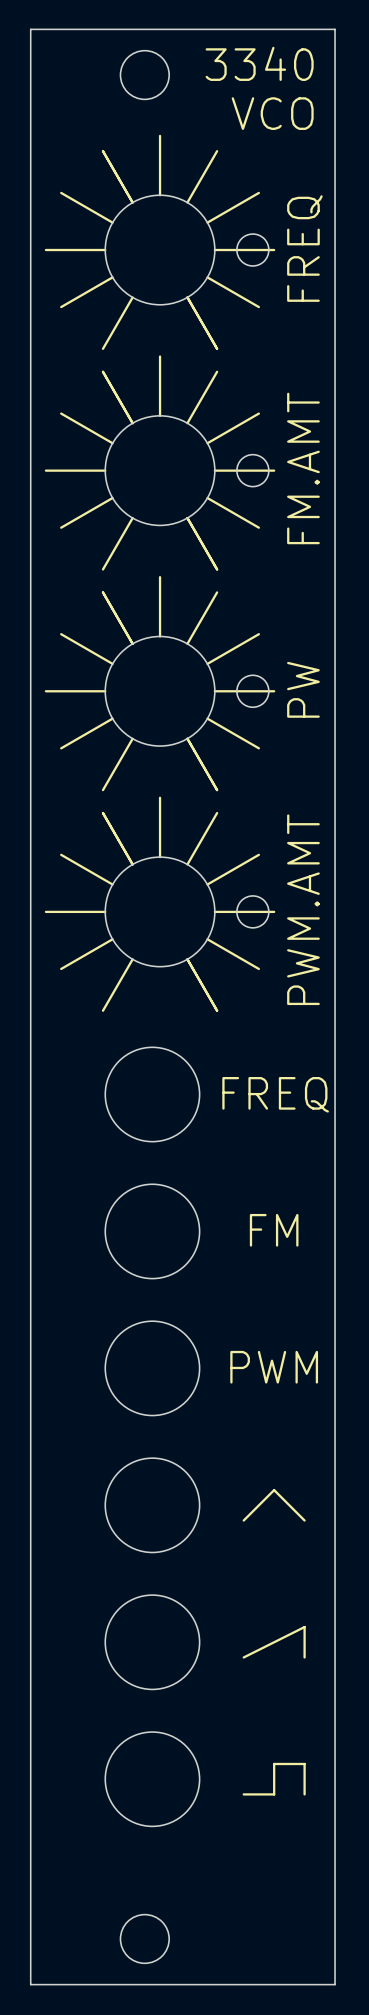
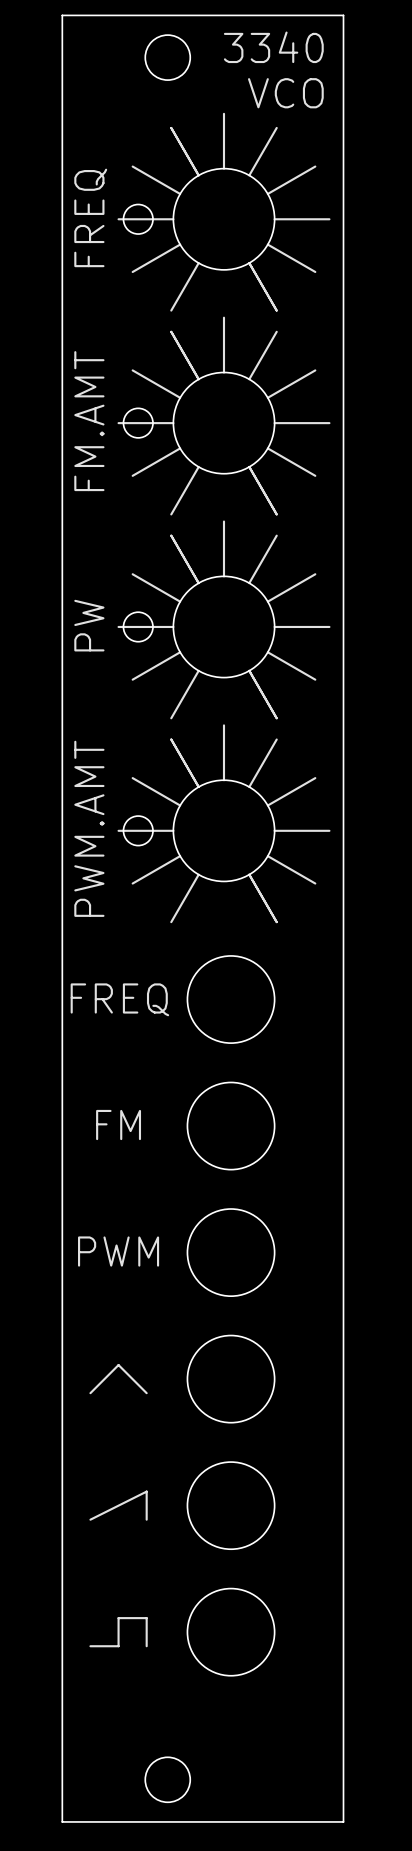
line: (160, 135) (160, 195) -> (224, 113) (224, 168)
line: (102, 151) (132, 202) -> (171, 127) (198, 175)
line: (217, 151) (187, 202) -> (276, 127) (249, 175)
line: (61, 192) (112, 222) -> (132, 166) (180, 193)
line: (258, 192) (207, 222) -> (315, 166) (267, 193)
round board edge: none -> [123, 204, 154, 235]
round board edge: [236, 233, 270, 267] -> none
text position: FREQ (304, 248) -> FREQ (90, 217)
line: (45, 250) (91, 250) -> (131, 219) (173, 219)
round board edge position: (160, 250) -> (224, 219)
line: (214, 250) (260, 250) -> (287, 219) (329, 219)
line: (112, 277) (61, 307) -> (180, 244) (132, 271)
line: (207, 277) (258, 307) -> (267, 244) (315, 271)
line: (132, 297) (102, 348) -> (198, 263) (171, 310)
line: (187, 297) (217, 348) -> (249, 263) (276, 310)
line: (160, 356) (160, 415) -> (224, 317) (224, 372)
line: (102, 371) (132, 423) -> (171, 331) (198, 379)
line: (217, 371) (187, 423) -> (276, 331) (249, 379)
line: (61, 413) (112, 443) -> (132, 370) (180, 397)
line: (258, 413) (207, 443) -> (315, 370) (267, 397)
round board edge: none -> [123, 408, 154, 439]
round board edge: [236, 454, 270, 487] -> none
text position: FM.AMT (303, 468) -> FM.AMT (89, 421)
line: (45, 470) (91, 470) -> (131, 423) (173, 423)
round board edge position: (160, 470) -> (224, 423)
line: (214, 470) (260, 470) -> (287, 423) (329, 423)
line: (112, 498) (61, 527) -> (180, 448) (132, 475)
line: (207, 498) (258, 527) -> (267, 448) (315, 475)
line: (132, 518) (102, 569) -> (198, 466) (171, 514)
line: (187, 518) (217, 569) -> (249, 466) (276, 514)
line: (160, 577) (160, 636) -> (224, 521) (224, 576)
line: (102, 592) (132, 643) -> (171, 535) (198, 583)
line: (217, 592) (187, 643) -> (276, 535) (249, 583)
line: (61, 634) (112, 663) -> (132, 574) (180, 601)
line: (258, 634) (207, 663) -> (315, 574) (267, 601)
round board edge: none -> [123, 611, 154, 643]
round board edge: [236, 674, 270, 708] -> none
text position: PW (303, 689) -> PW (89, 625)
line: (45, 691) (91, 691) -> (131, 626) (173, 626)
round board edge position: (160, 691) -> (224, 626)
line: (214, 691) (260, 691) -> (287, 626) (329, 626)
line: (112, 718) (61, 748) -> (180, 652) (132, 679)
line: (207, 718) (258, 748) -> (267, 652) (315, 679)
line: (132, 738) (102, 790) -> (198, 670) (171, 718)
line: (187, 738) (217, 790) -> (249, 670) (276, 718)
line: (160, 797) (160, 857) -> (224, 725) (224, 780)
line: (102, 813) (132, 864) -> (171, 739) (198, 786)
line: (217, 813) (187, 864) -> (276, 739) (249, 786)
line: (61, 854) (112, 884) -> (132, 778) (180, 805)
line: (258, 854) (207, 884) -> (315, 778) (267, 805)
round board edge: none -> [123, 815, 154, 846]
round board edge: [236, 895, 270, 929] -> none
text position: PWM.AMT (303, 909) -> PWM.AMT (89, 828)
line: (45, 911) (91, 911) -> (131, 830) (173, 830)
round board edge position: (160, 911) -> (224, 830)
line: (214, 911) (260, 911) -> (287, 830) (329, 830)
line: (112, 939) (61, 968) -> (180, 856) (132, 883)
line: (207, 939) (258, 968) -> (267, 856) (315, 883)
line: (132, 959) (102, 1010) -> (198, 874) (171, 922)
line: (187, 959) (217, 1010) -> (249, 874) (276, 922)
round board edge position: (152, 1094) -> (231, 999)
text position: FREQ (275, 1094) -> FREQ (119, 999)
text position: FM (274, 1230) -> FM (118, 1125)
round board edge position: (152, 1231) -> (231, 1126)
text position: PWM (274, 1367) -> PWM (118, 1251)
round board edge position: (152, 1368) -> (231, 1252)
round board edge position: (152, 1505) -> (231, 1379)
line: (243, 1520) (274, 1490) (304, 1520) -> (90, 1393) (118, 1365) (146, 1393)
round board edge position: (152, 1642) -> (231, 1505)
line: (243, 1657) (304, 1627) (304, 1657) -> (90, 1519) (146, 1491) (146, 1519)
round board edge position: (152, 1779) -> (231, 1632)
line: (243, 1794) (274, 1794) (274, 1763) (304, 1763) (304, 1794) -> (90, 1646) (118, 1646) (118, 1618) (146, 1618) (146, 1646)

